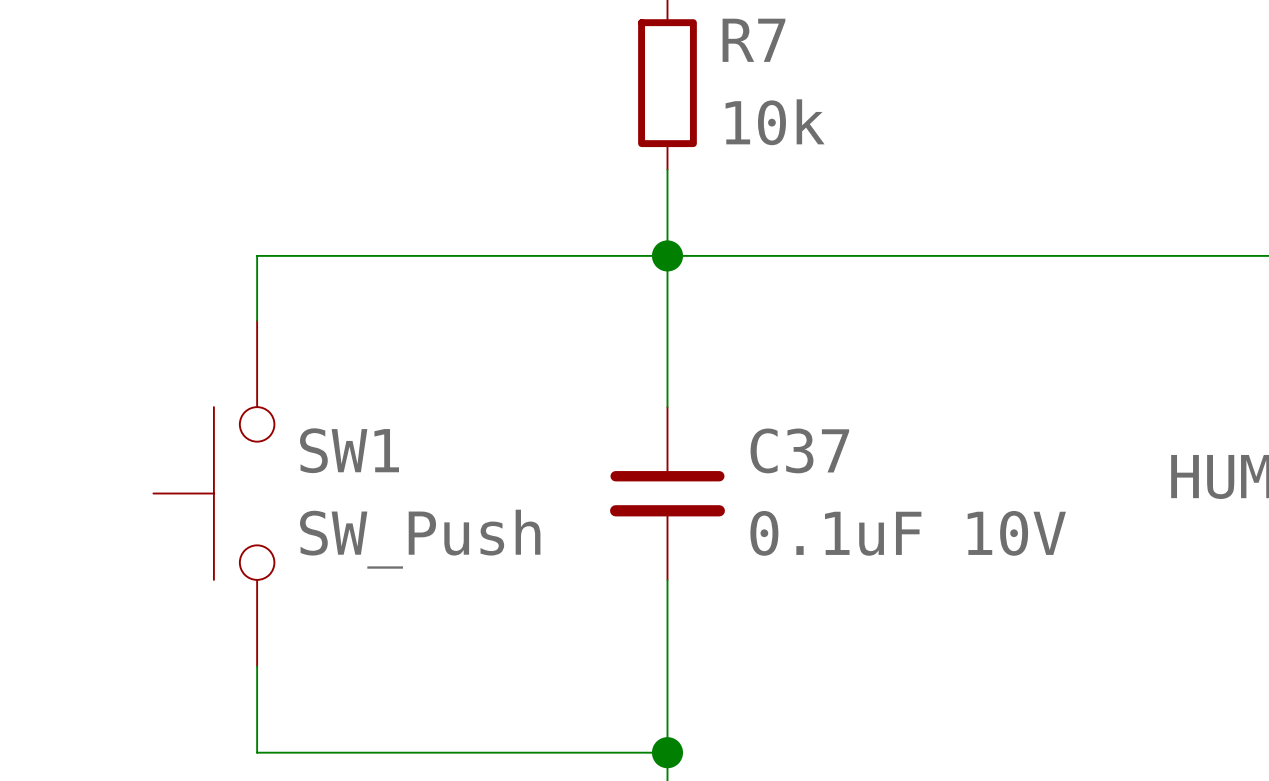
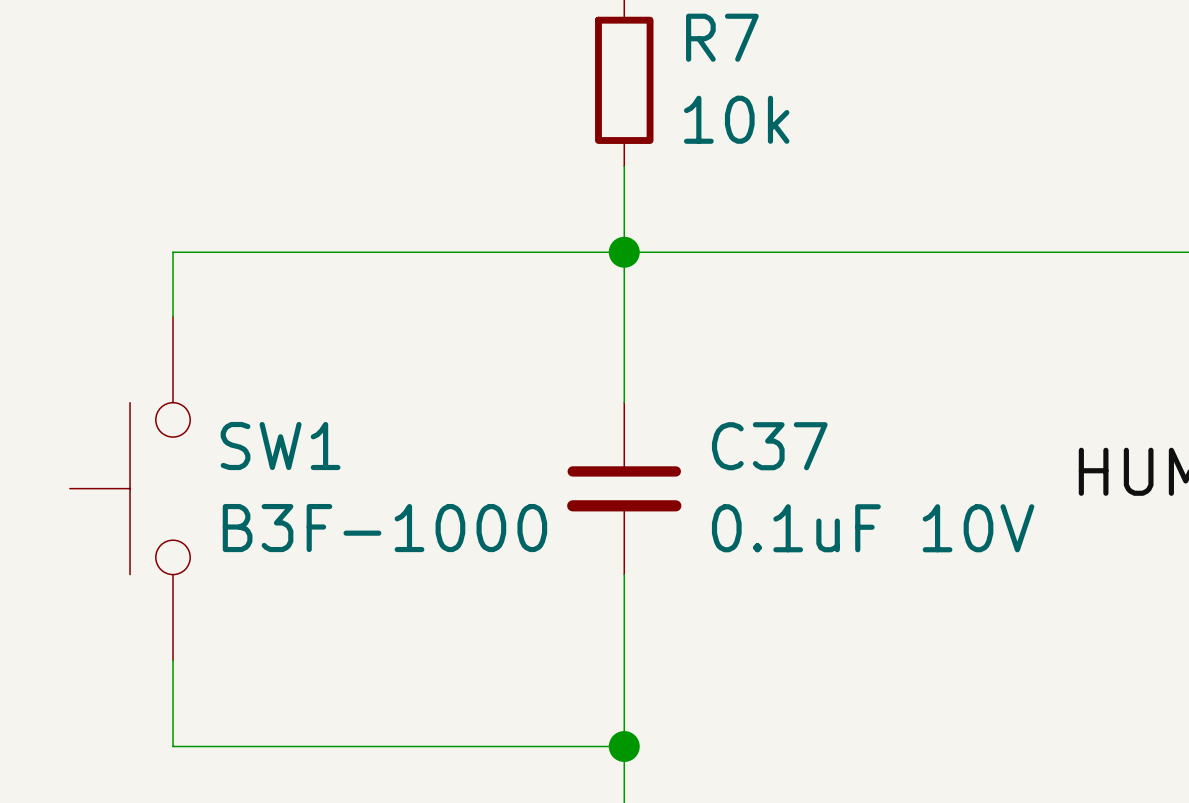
wire: (257, 255) (257, 320) -> (215, 252) (173, 252) (173, 316)
SW1 position: (213, 493) -> (130, 488)
SW1 value: SW_Push (420, 539) -> B3F-1000 (384, 528)
wire: (257, 666) (257, 752) -> (173, 660) (173, 746) (215, 746)

